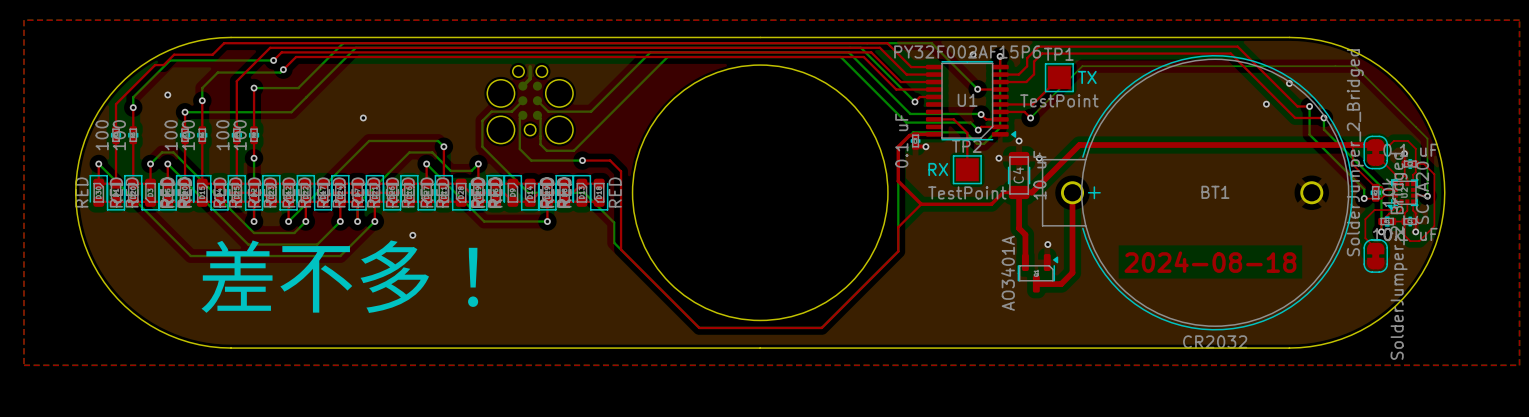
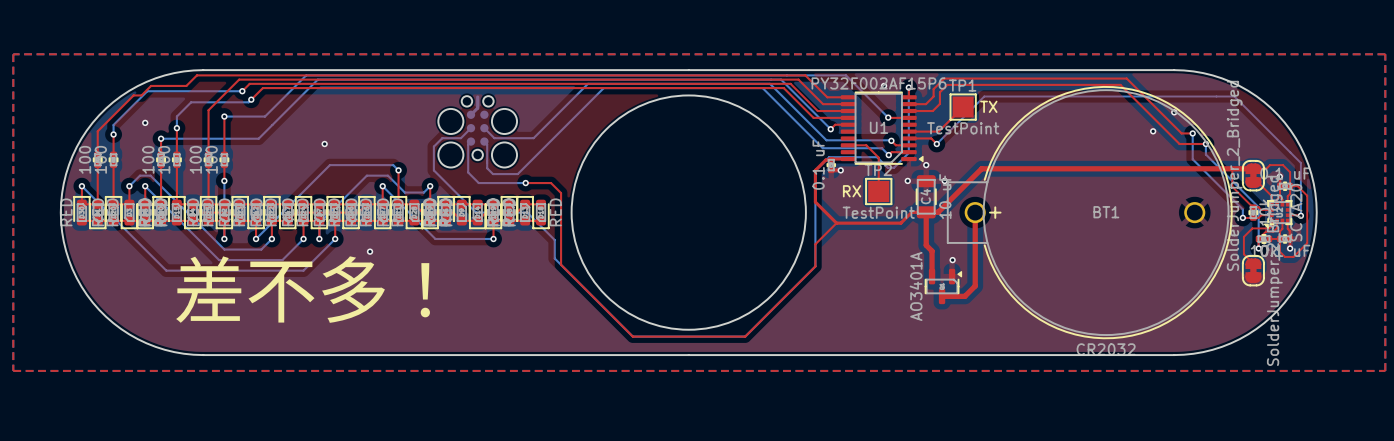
text: 2024-08-18 (1210, 262) -> none

